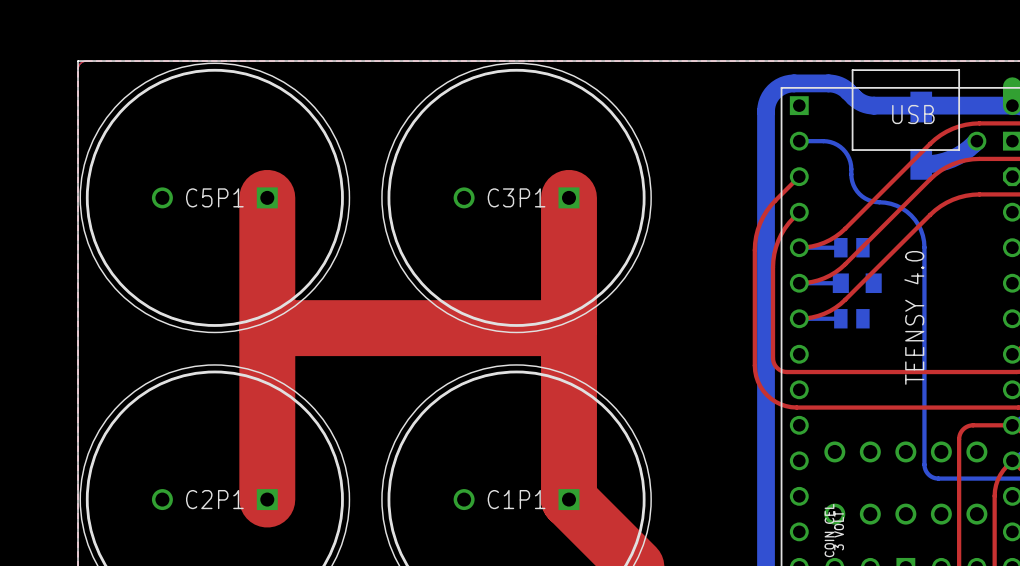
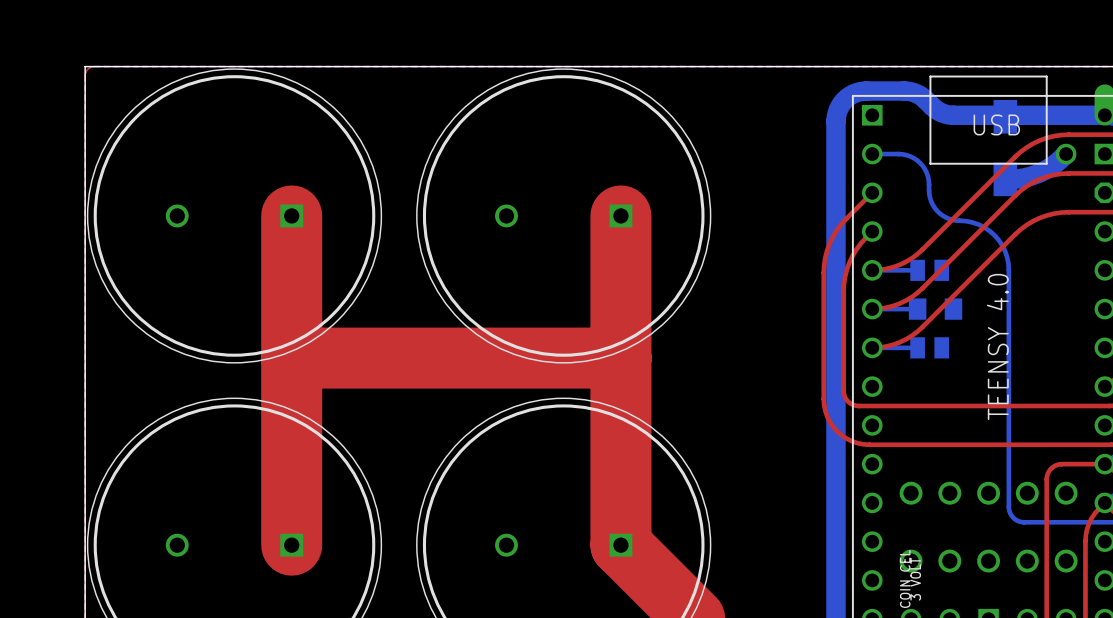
C5P1 name: C5P1 (214, 197) -> none
C3P1 name: C3P1 (516, 197) -> none
C2P1 name: C2P1 (214, 499) -> none
C1P1 name: C1P1 (516, 499) -> none

